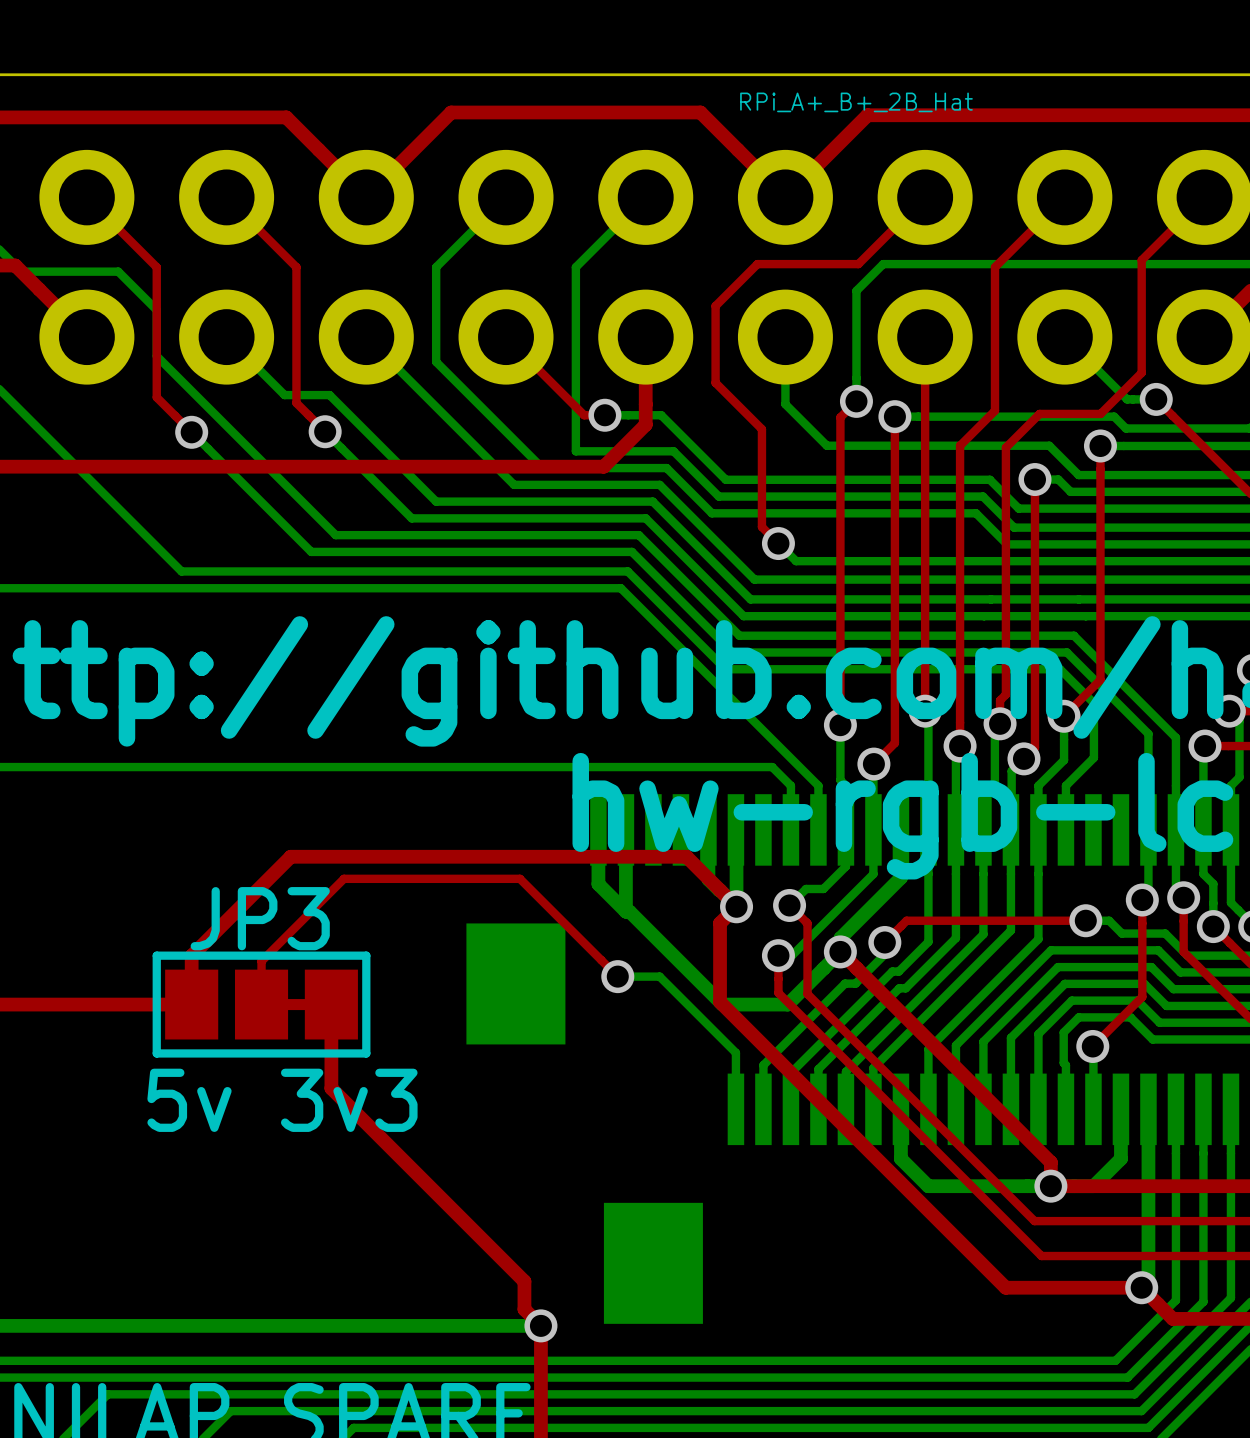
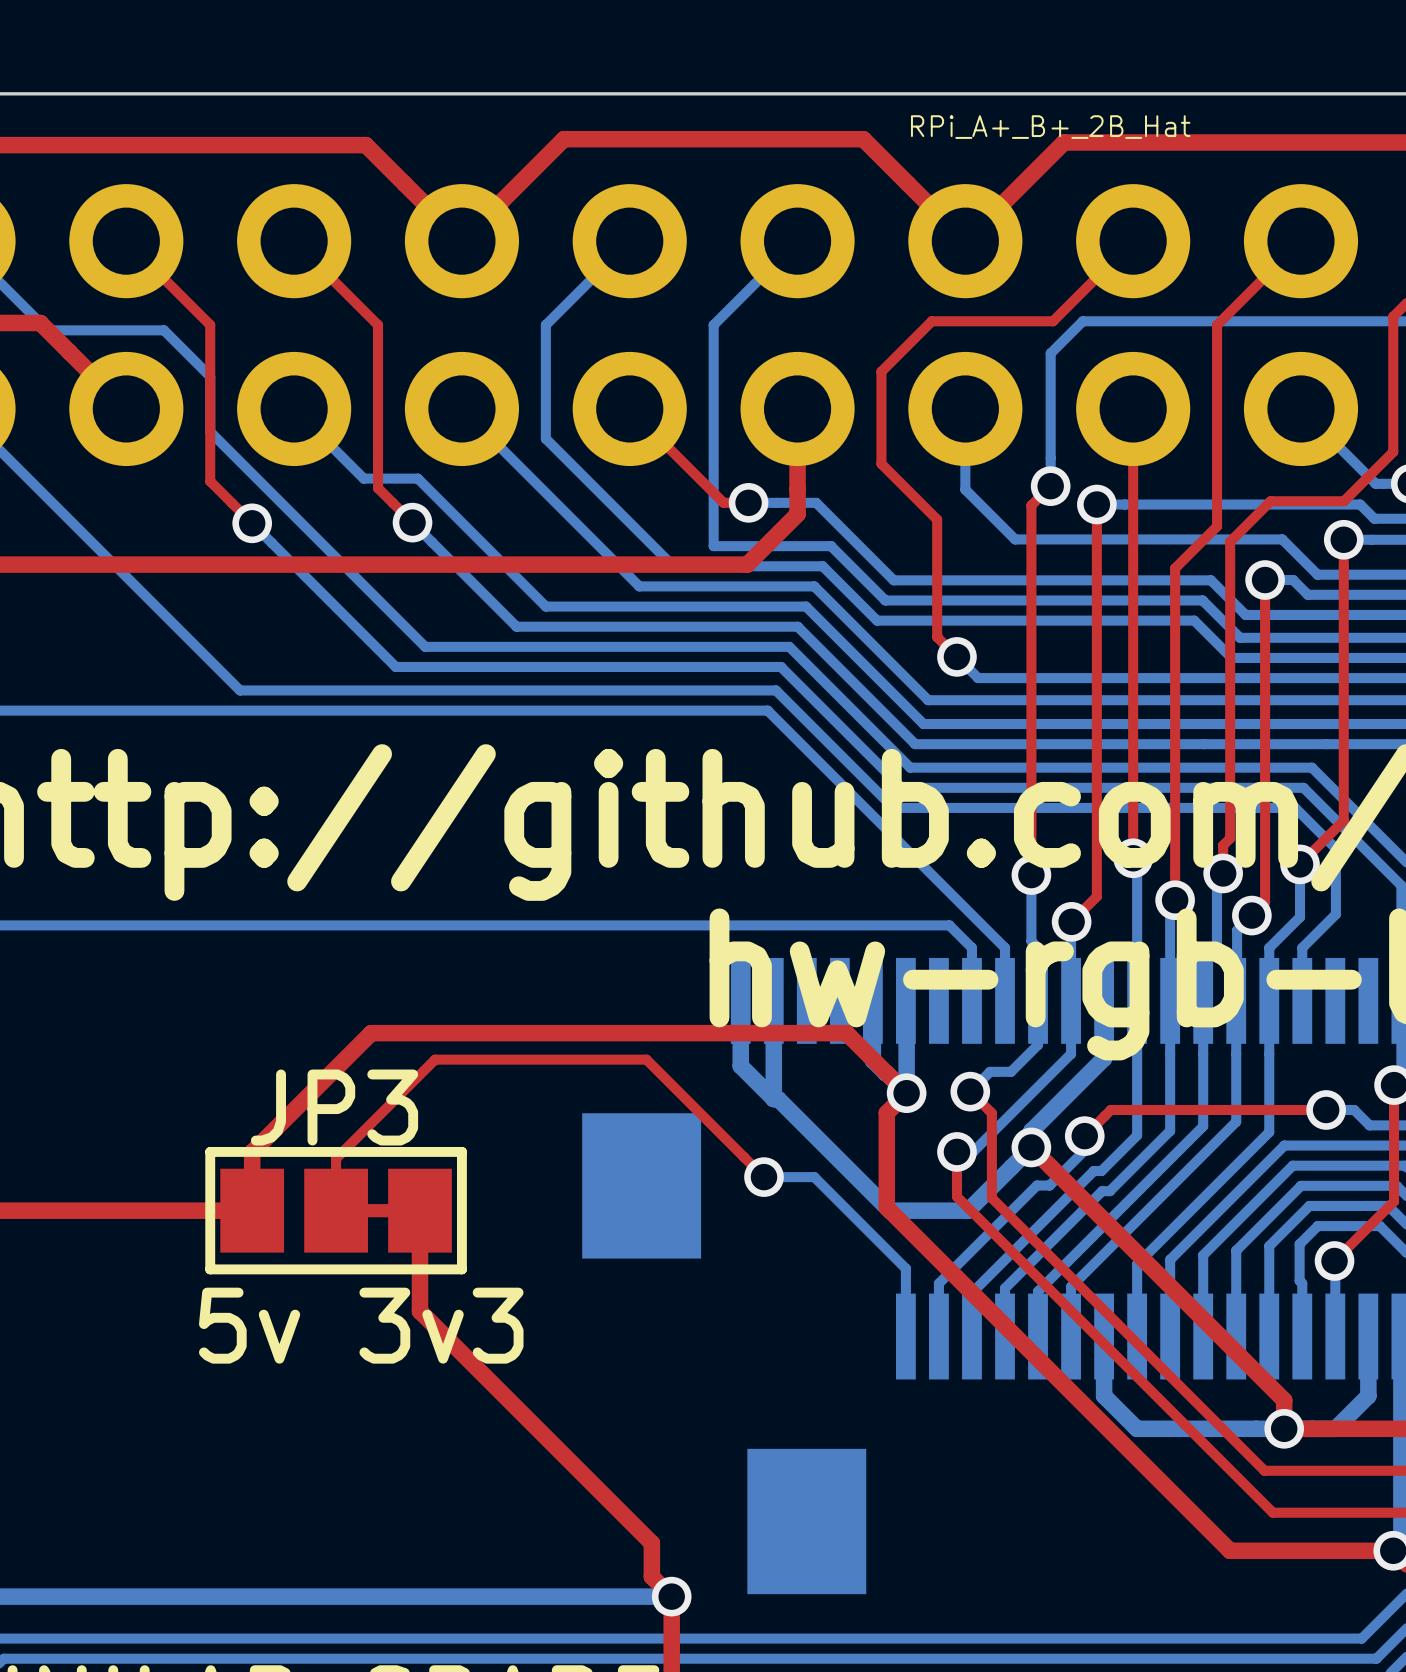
top track: (994, 410) (960, 445) (960, 469) -> (1217, 497) (1217, 526) (1175, 568)

